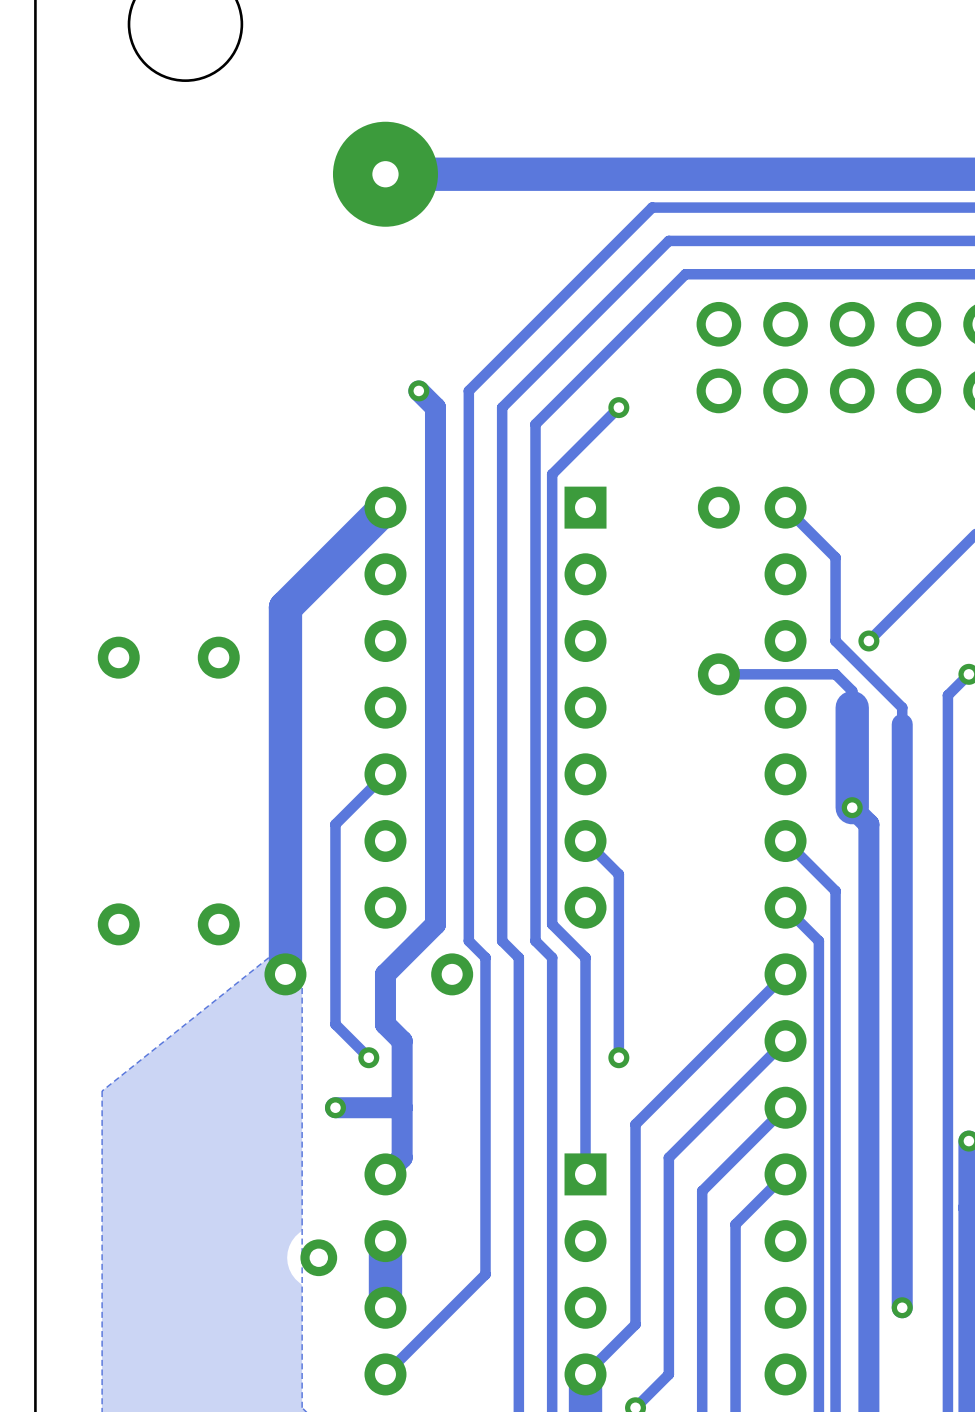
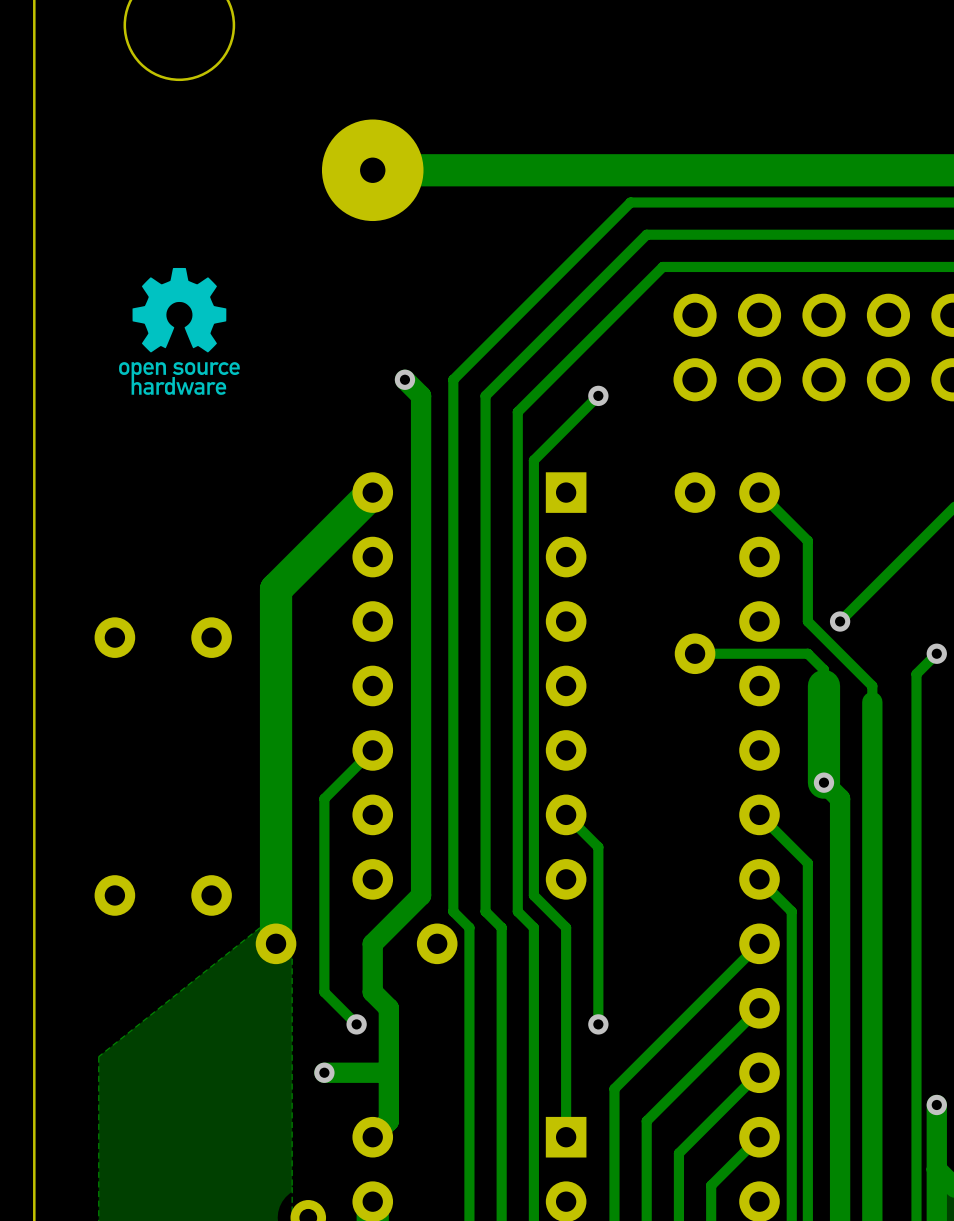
drawing: none -> [119, 267, 240, 395]

